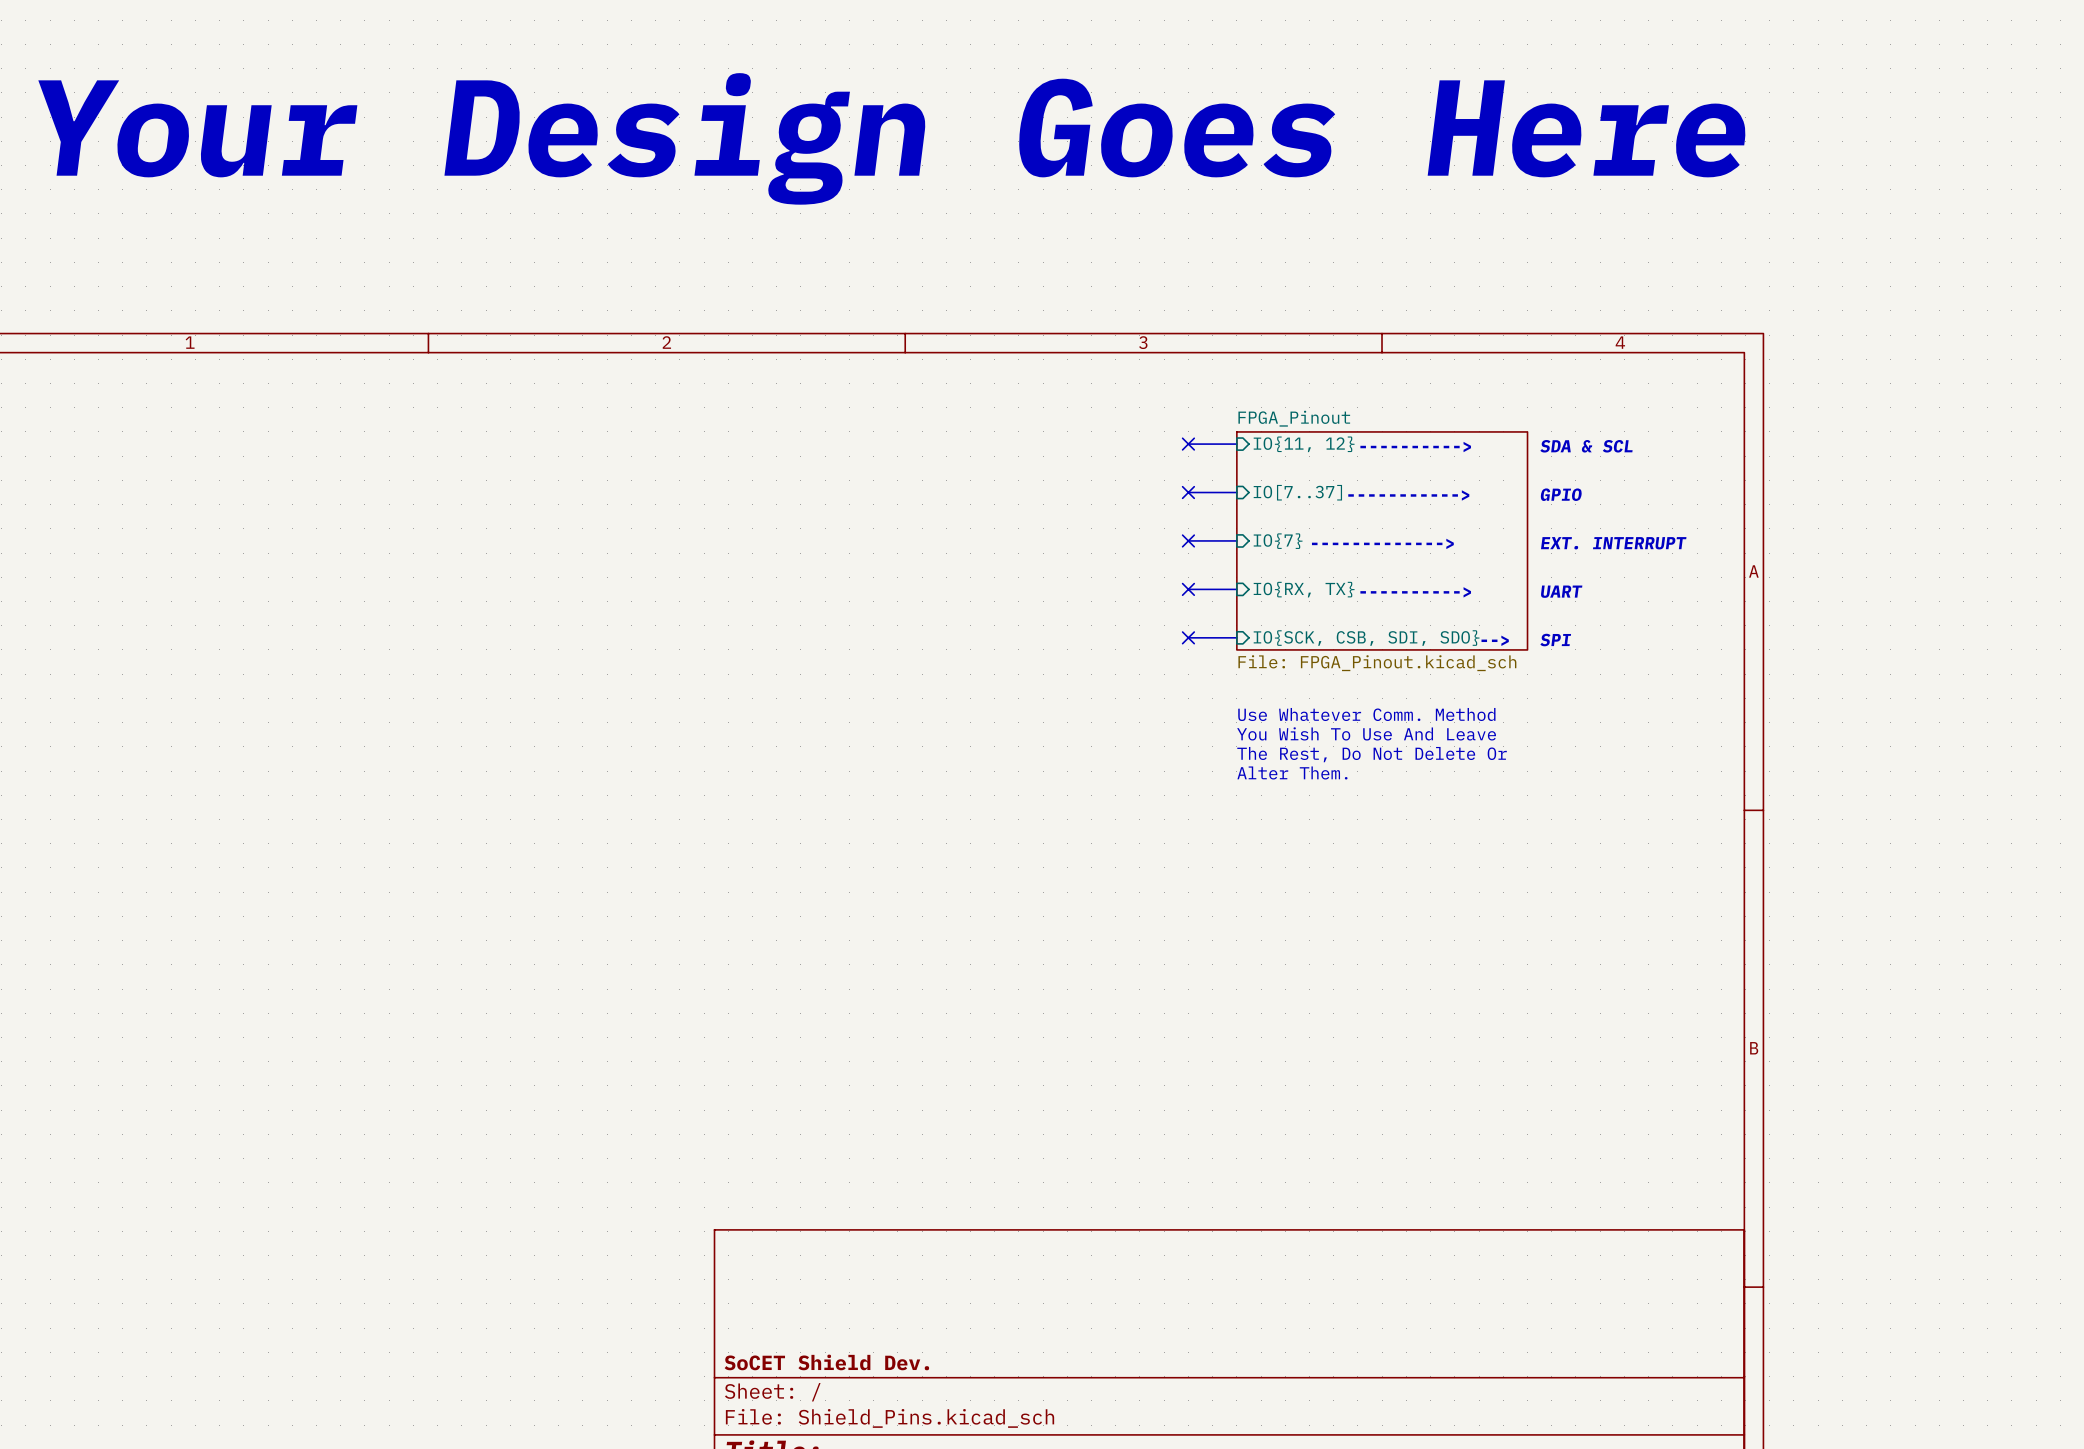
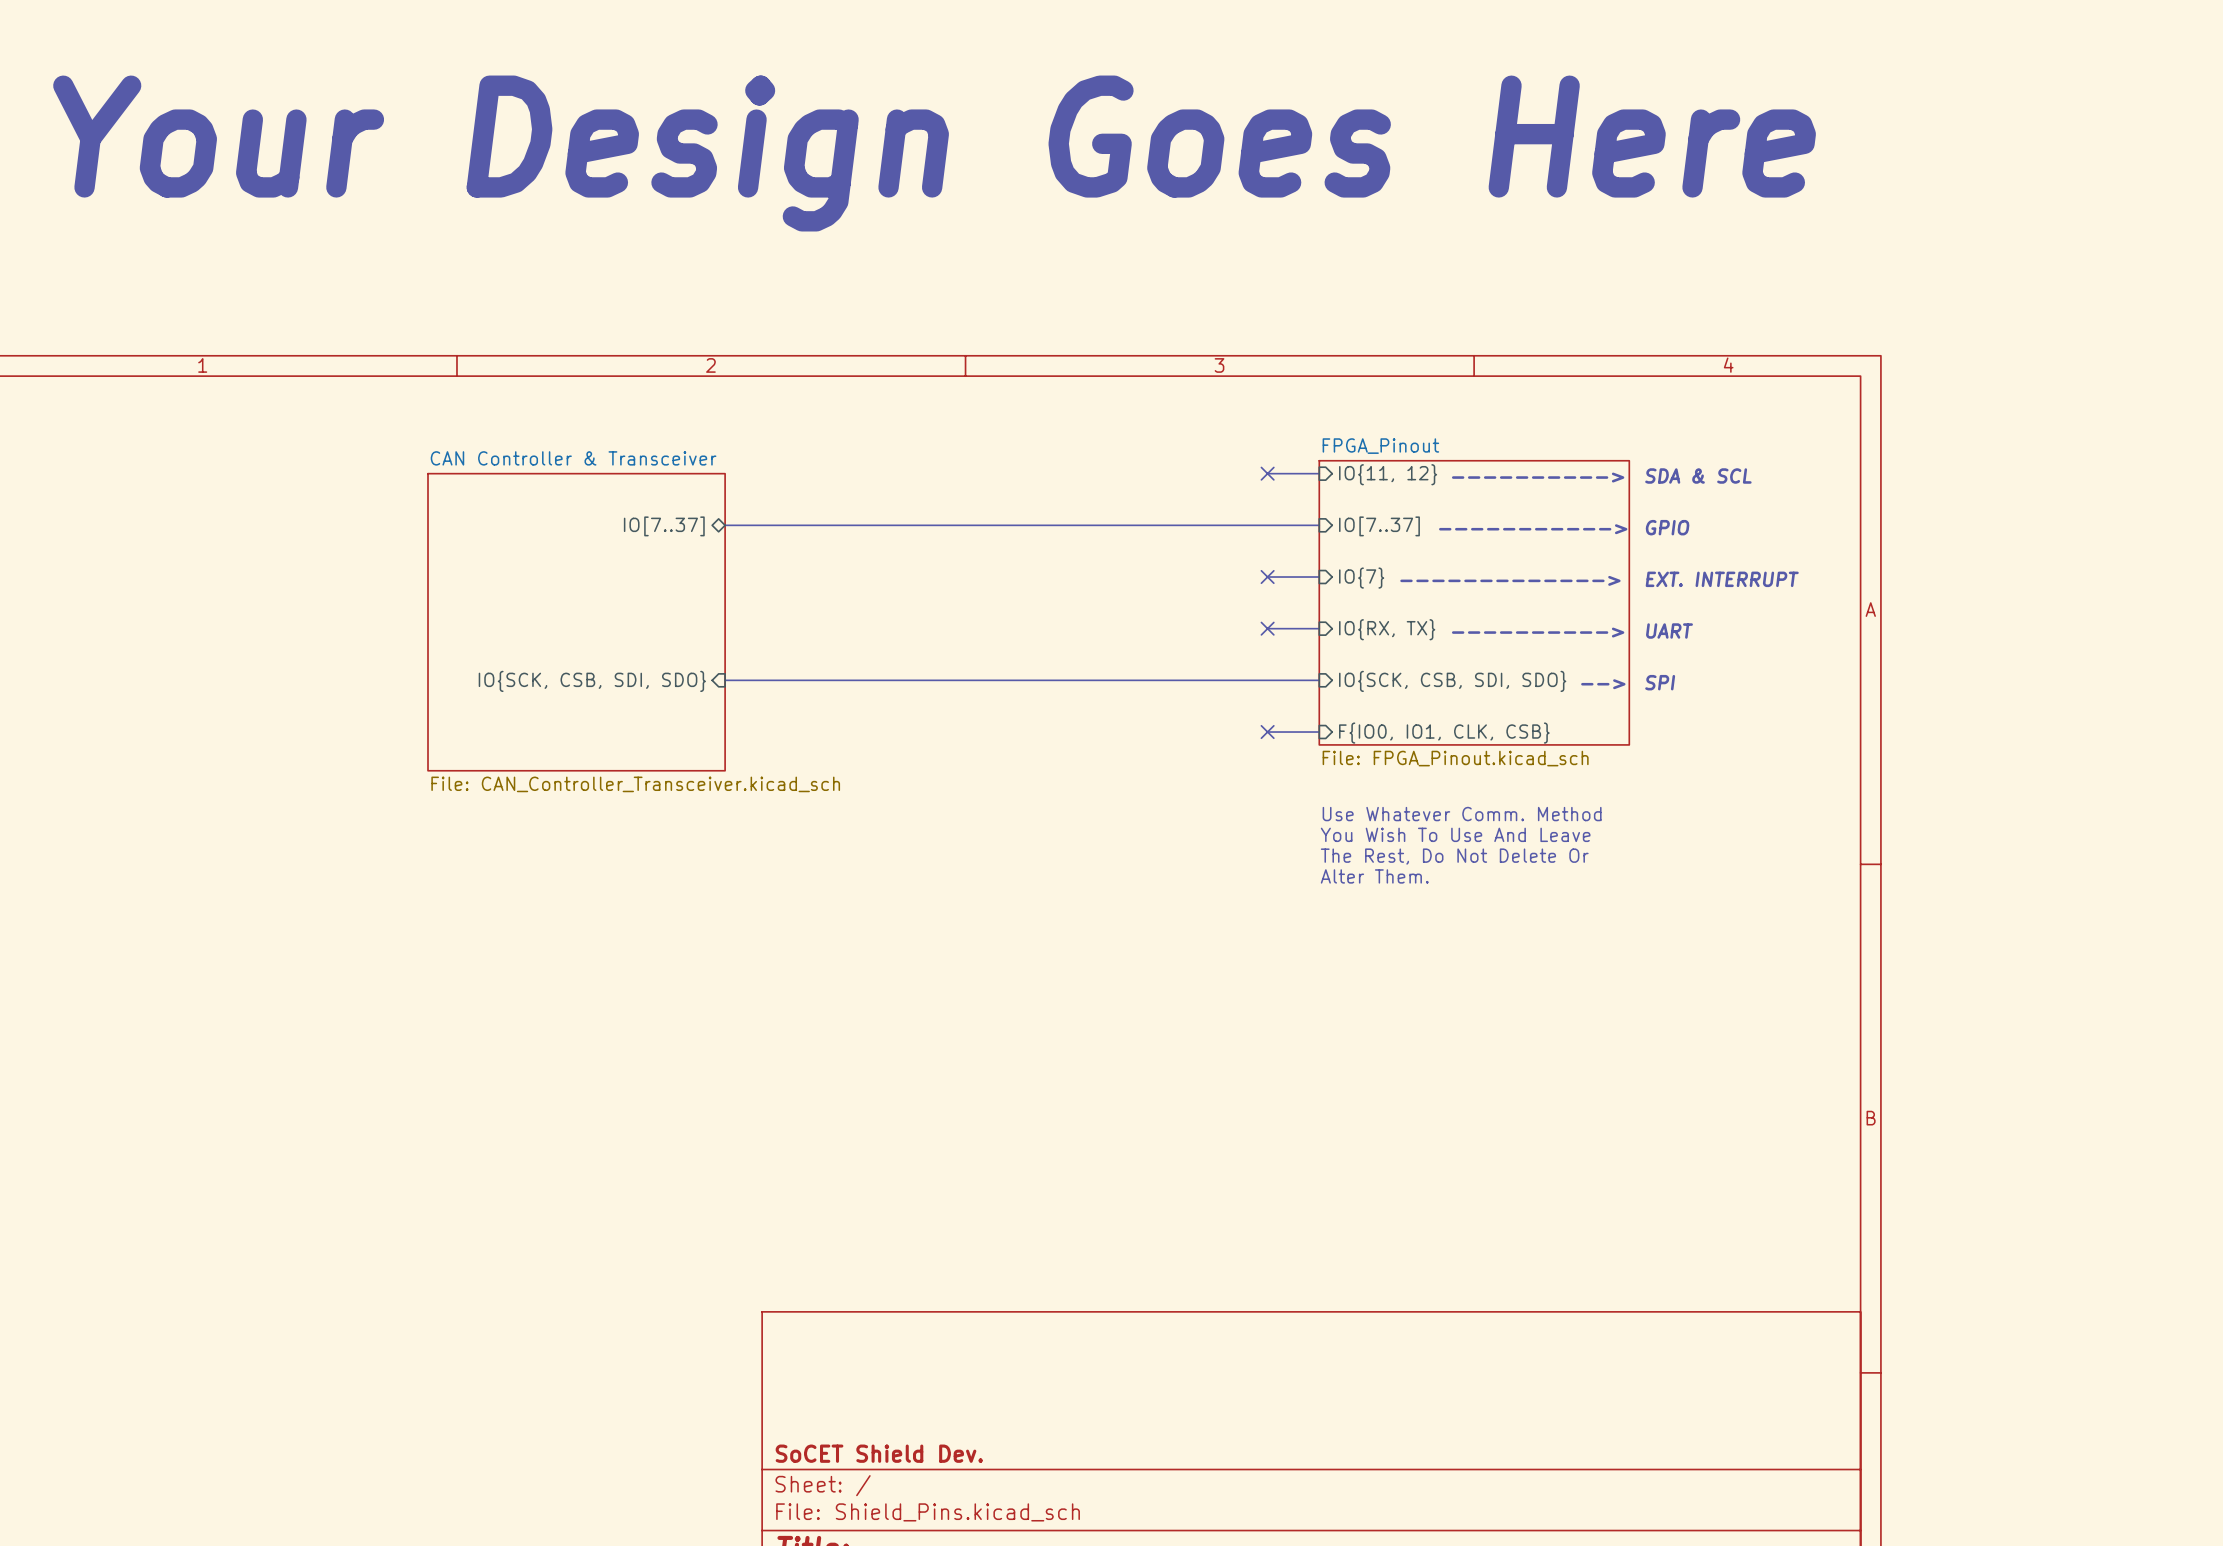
sheet pin: none -> IO[7..37] (664, 526)
bus: none -> (725, 525) (1267, 525)
no-connect mark: (1188, 492) -> none
sheet FPGA_Pinout: File: FPGA_Pinout.kicad_sch (1382, 540) -> none
sheet FPGA_Pinout: none -> File: FPGA_Pinout.kicad_sch (1474, 602)
sheet CAN Controller & Transceiver: none -> File: CAN_Controller_Transceiver.kicad_sch (576, 622)
bus: none -> (725, 680) (1267, 680)
no-connect mark position: (1188, 637) -> (1267, 732)
sheet pin: none -> IO{SCK, CSB, SDI, SDO} (592, 681)
bus: none -> (1267, 732) (1319, 732)
sheet pin: none -> F{IO0, IO1, CLK, CSB} (1444, 733)
text position: Use Whatever Comm. Method (1366, 714) -> Use Whatever Comm. Method (1462, 814)
text position: You Wish To Use And Leave (1366, 733) -> You Wish To Use And Leave (1455, 834)
text position: The Rest, Do Not Delete Or (1372, 754) -> The Rest, Do Not Delete Or (1454, 856)
text position: Alter Them. (1292, 772) -> Alter Them. (1374, 876)

